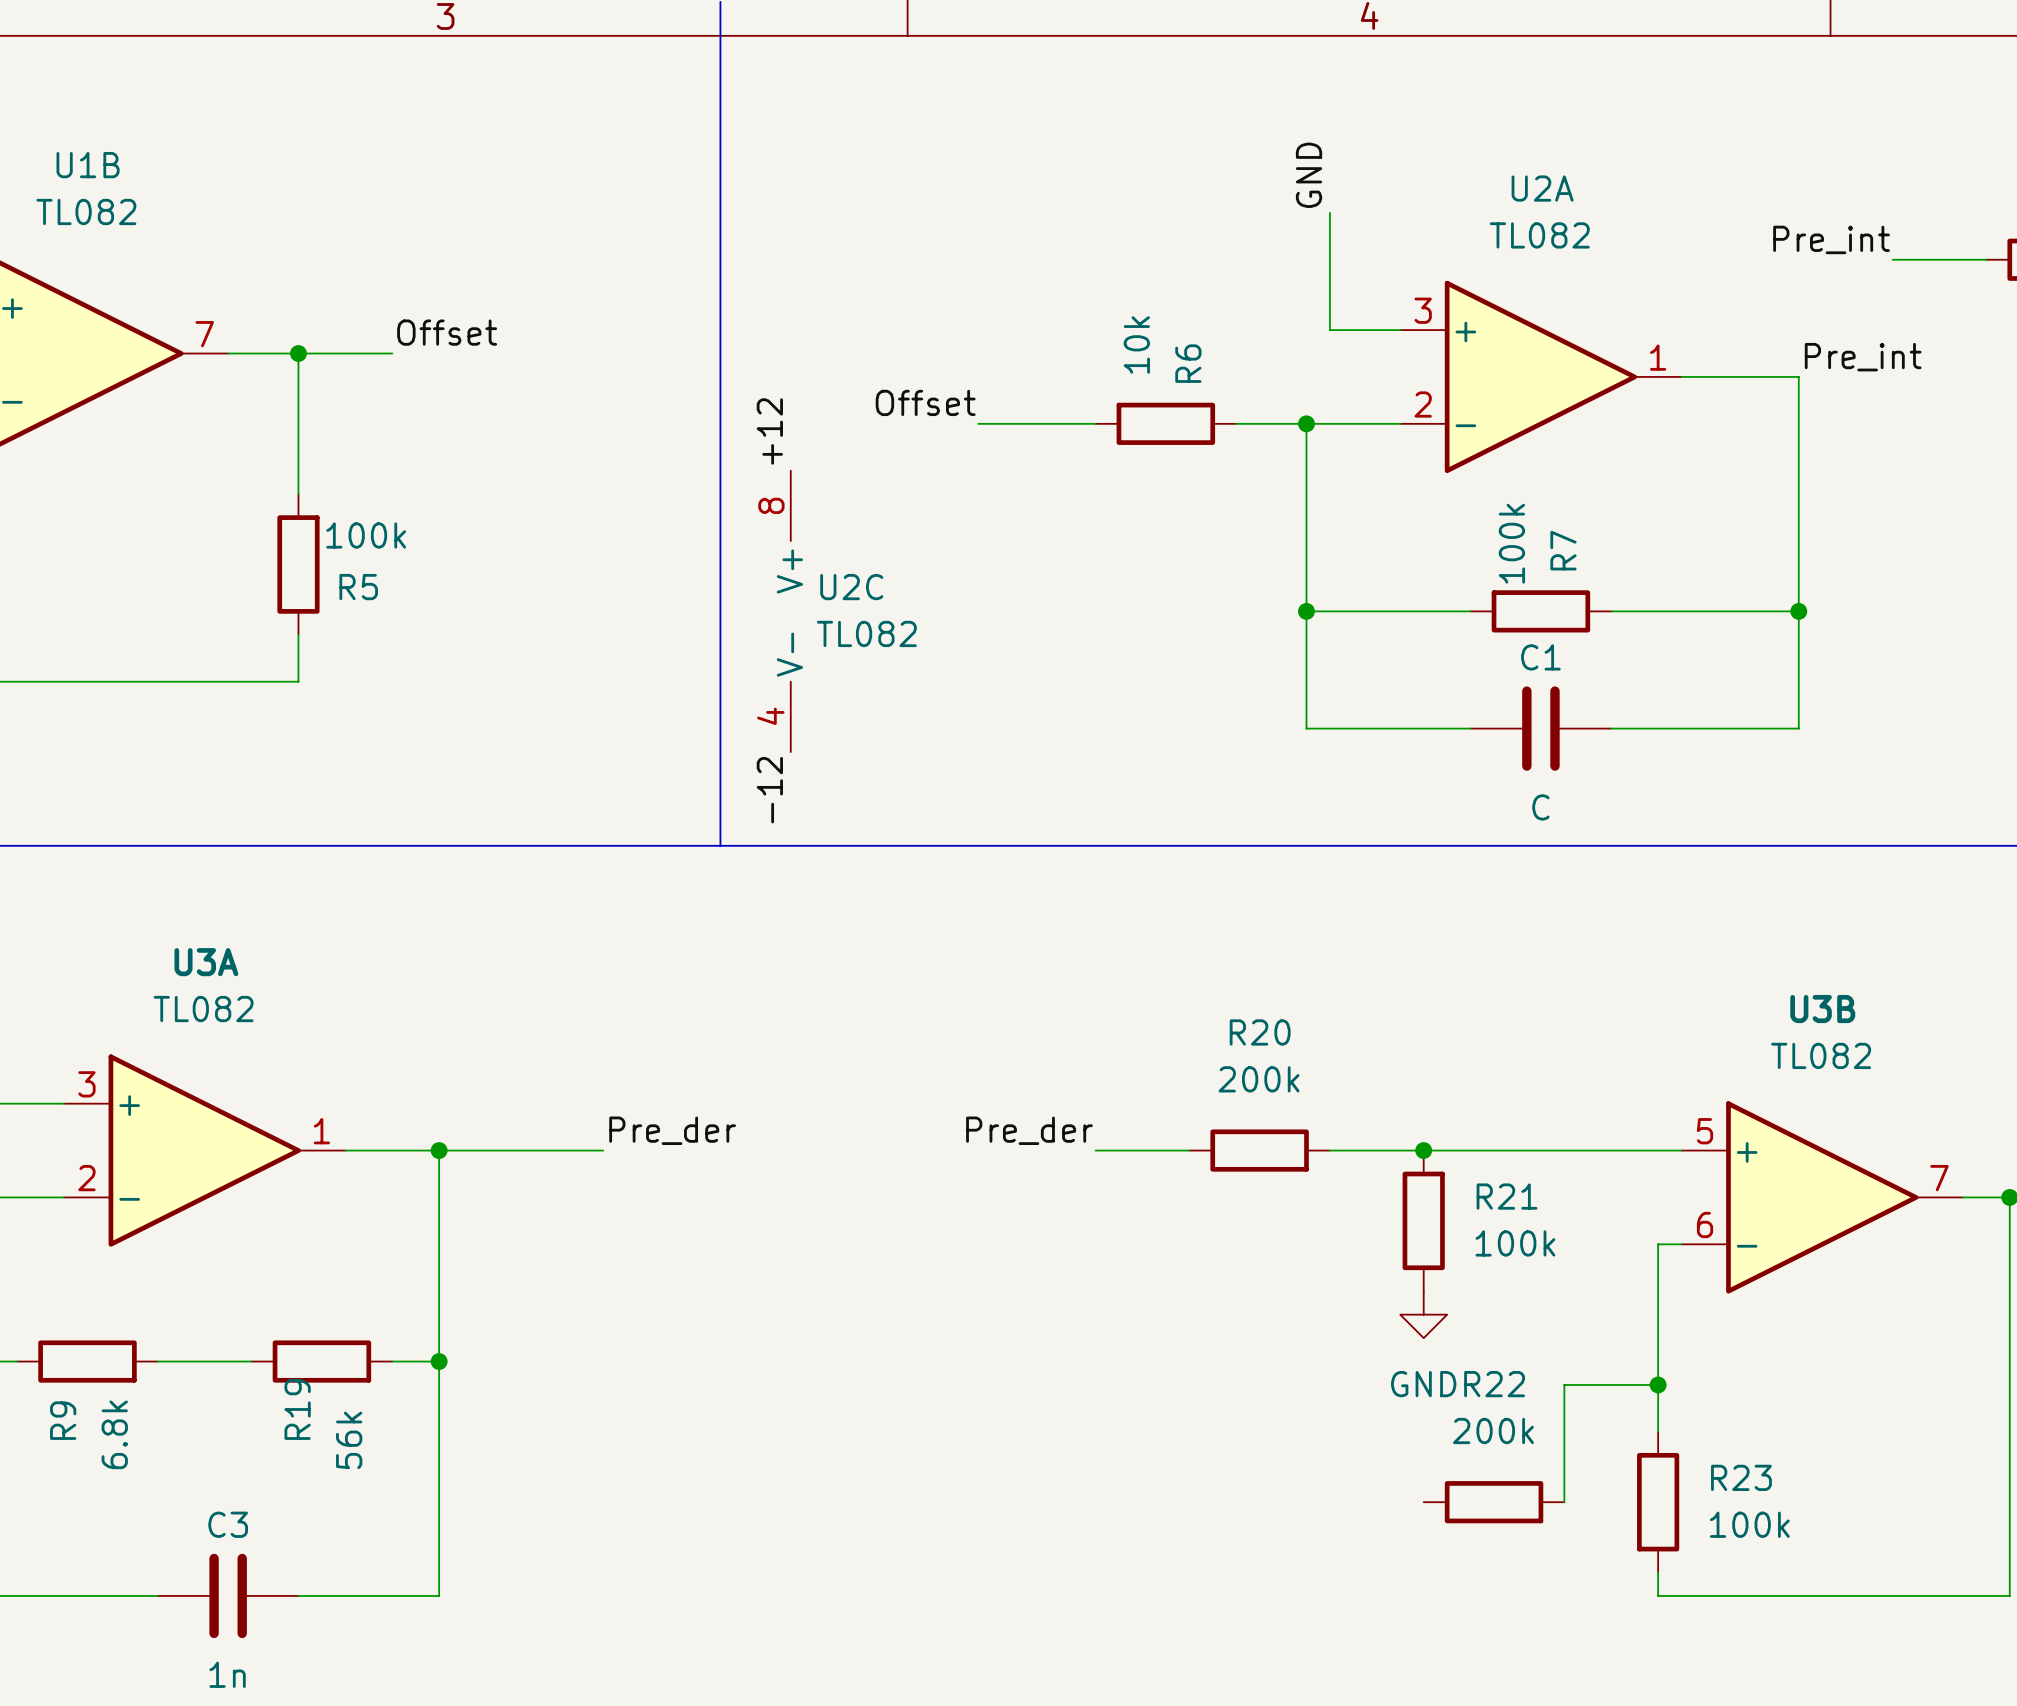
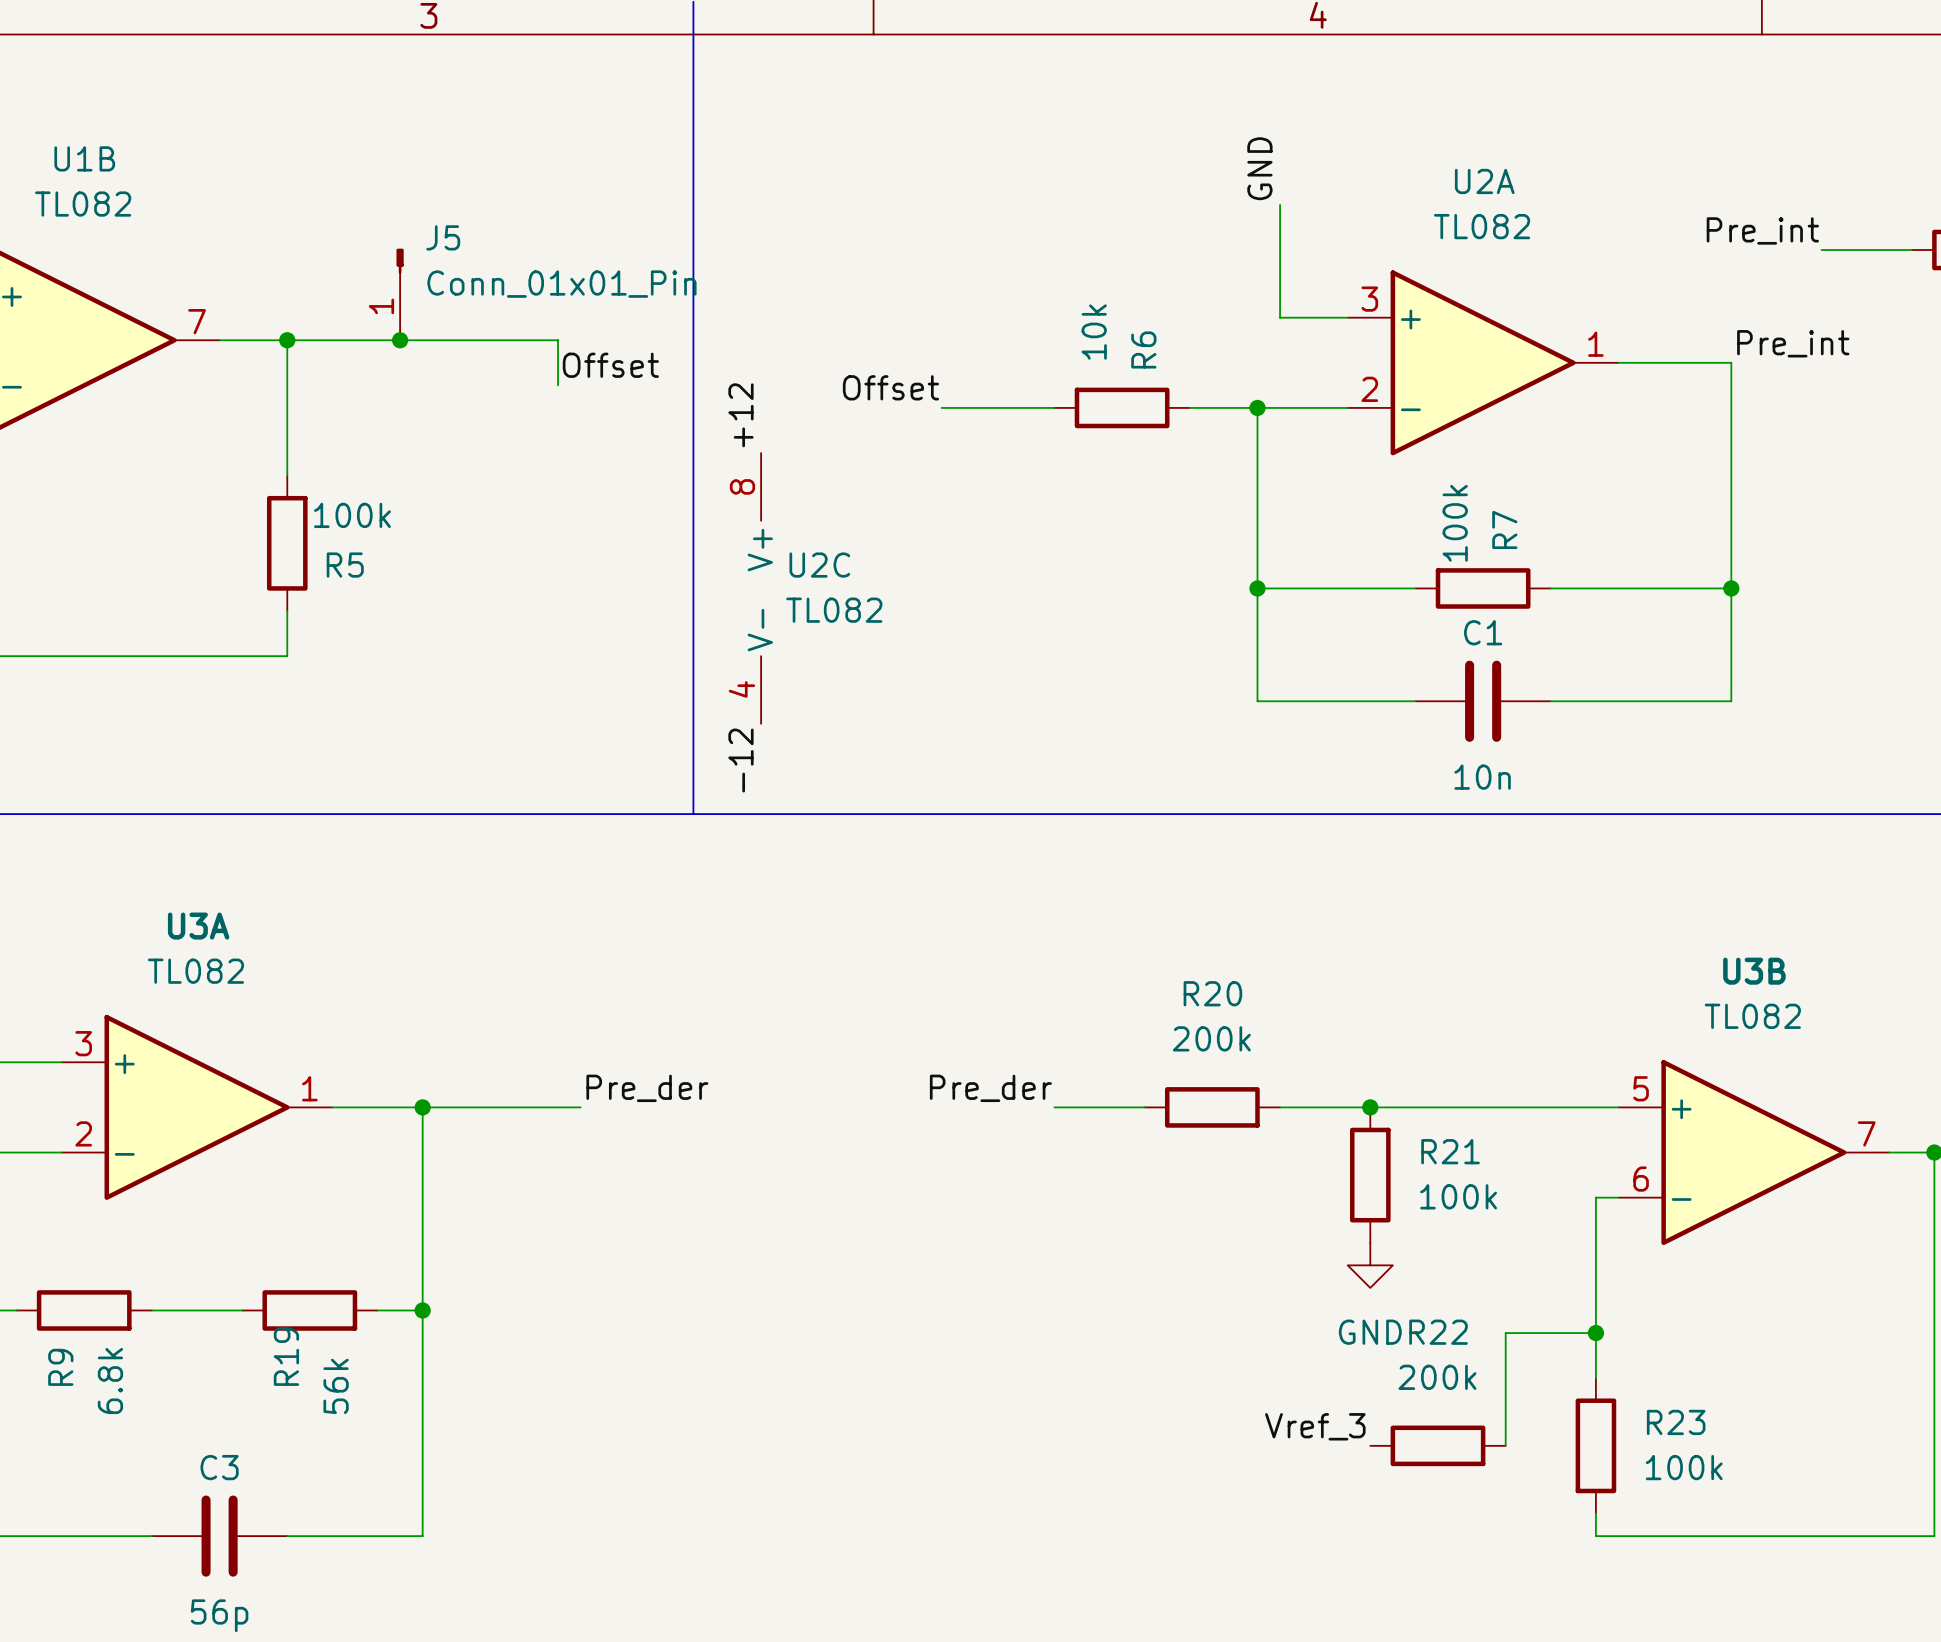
J5: none -> Conn_01x01_Pin (400, 294)
label position: Offset (447, 332) -> Offset (610, 365)
wire: none -> (377, 340) (558, 340) (558, 385)
junction: none -> (400, 340)
C1 value: C (1540, 807) -> 10n (1482, 777)
label: none -> Vref_3 (1315, 1426)
C3 value: 1n (227, 1674) -> 56p (219, 1615)

